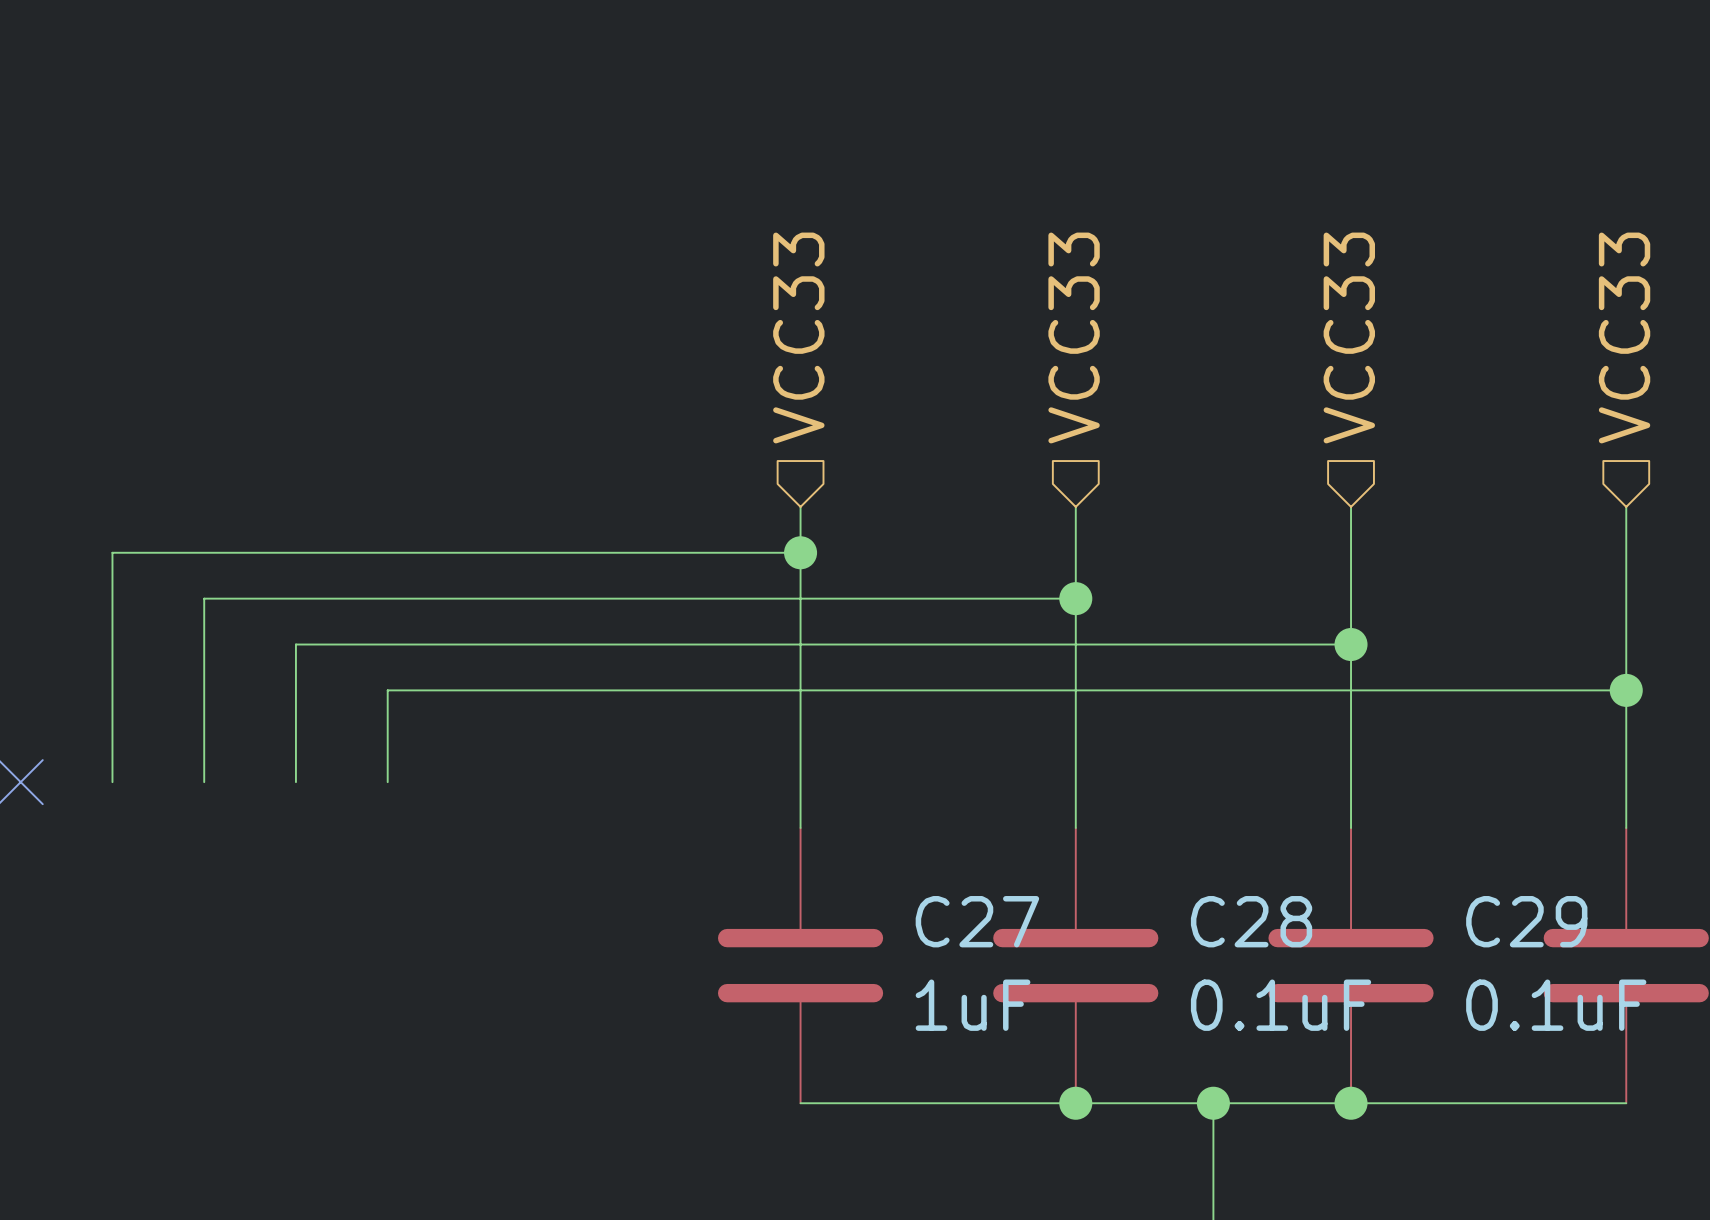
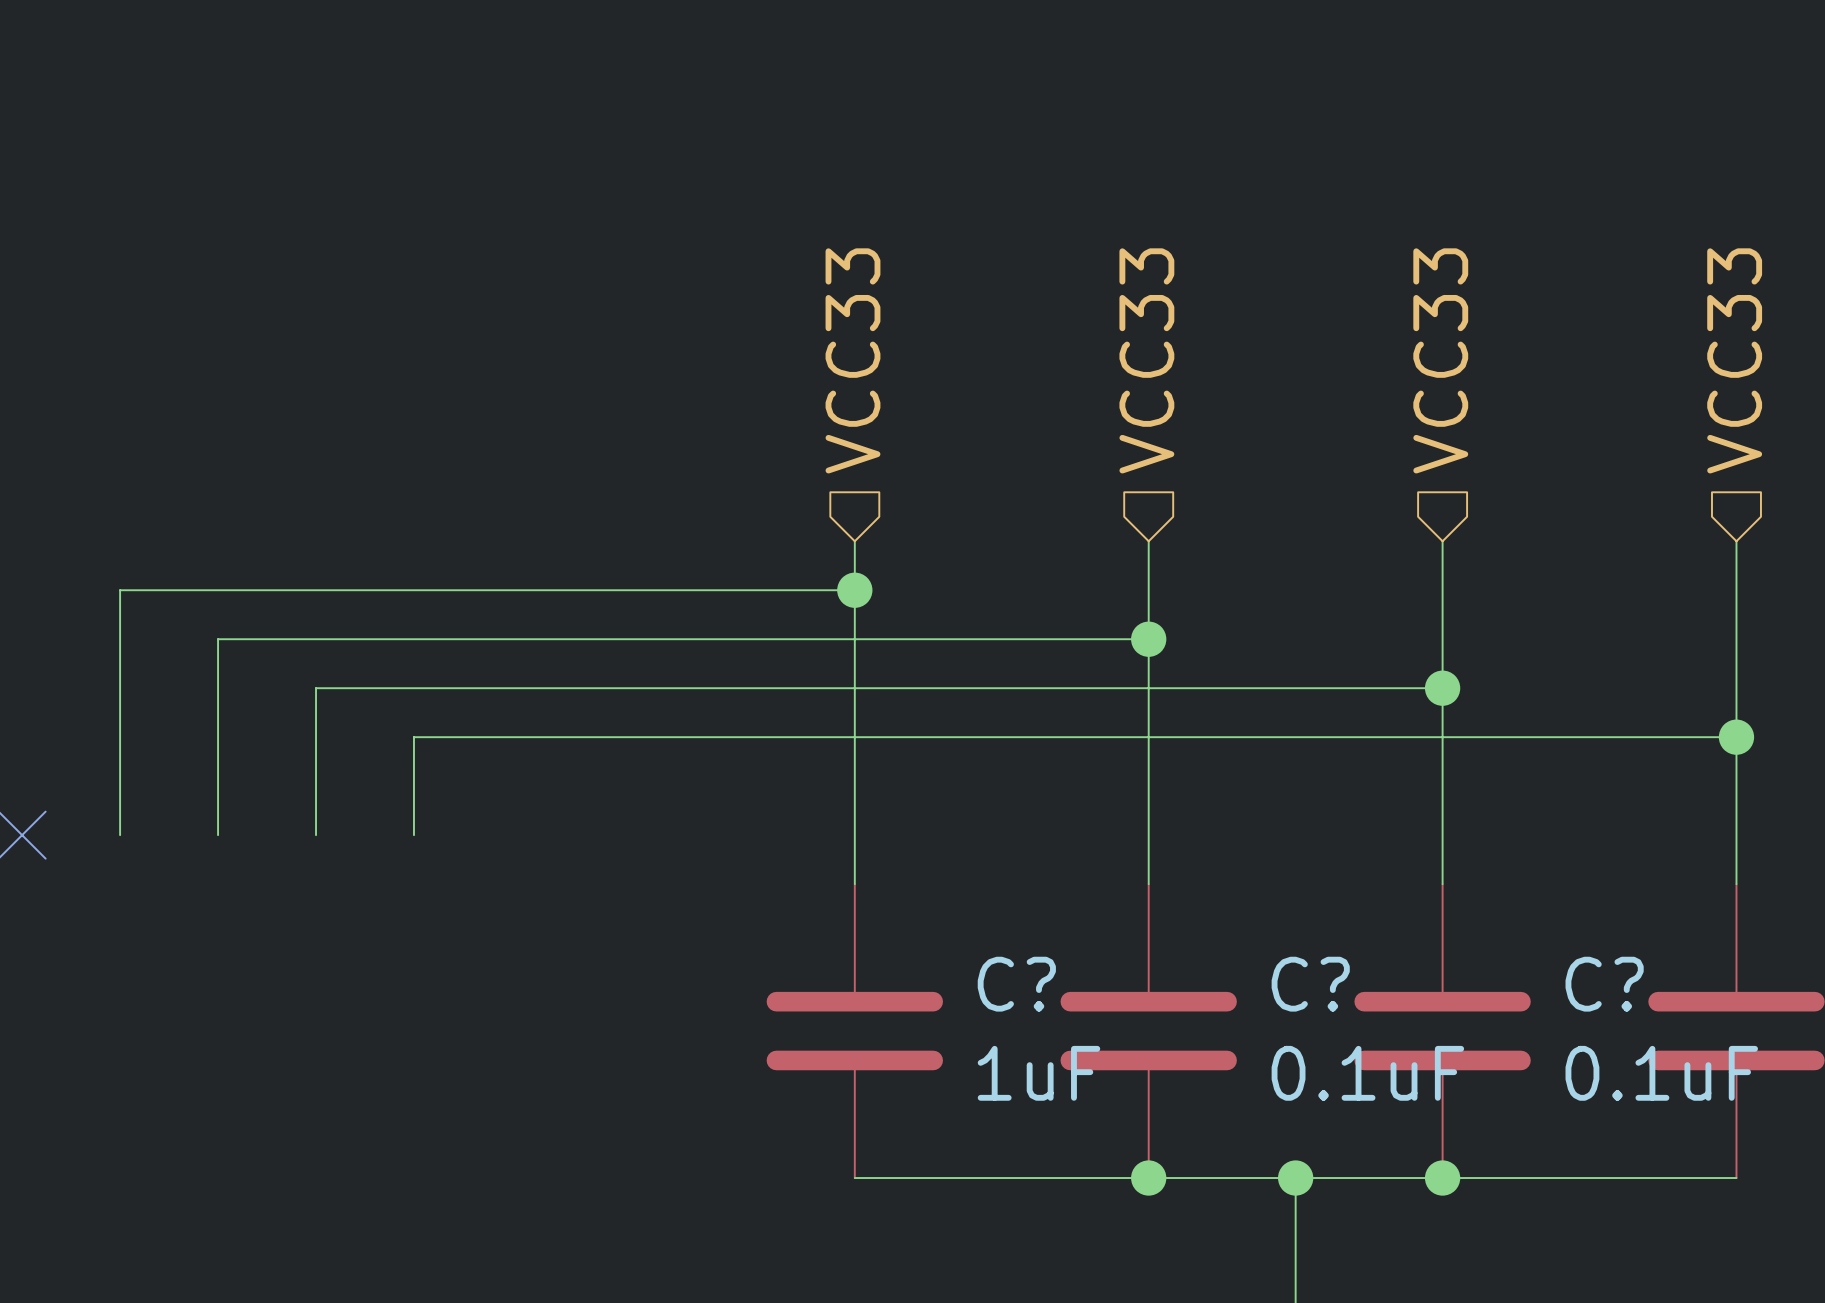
C27 name: C27 (977, 921) -> C? (1016, 984)
C28 name: C28 (1251, 921) -> C? (1310, 984)
C29 name: C29 (1526, 921) -> C? (1604, 984)

